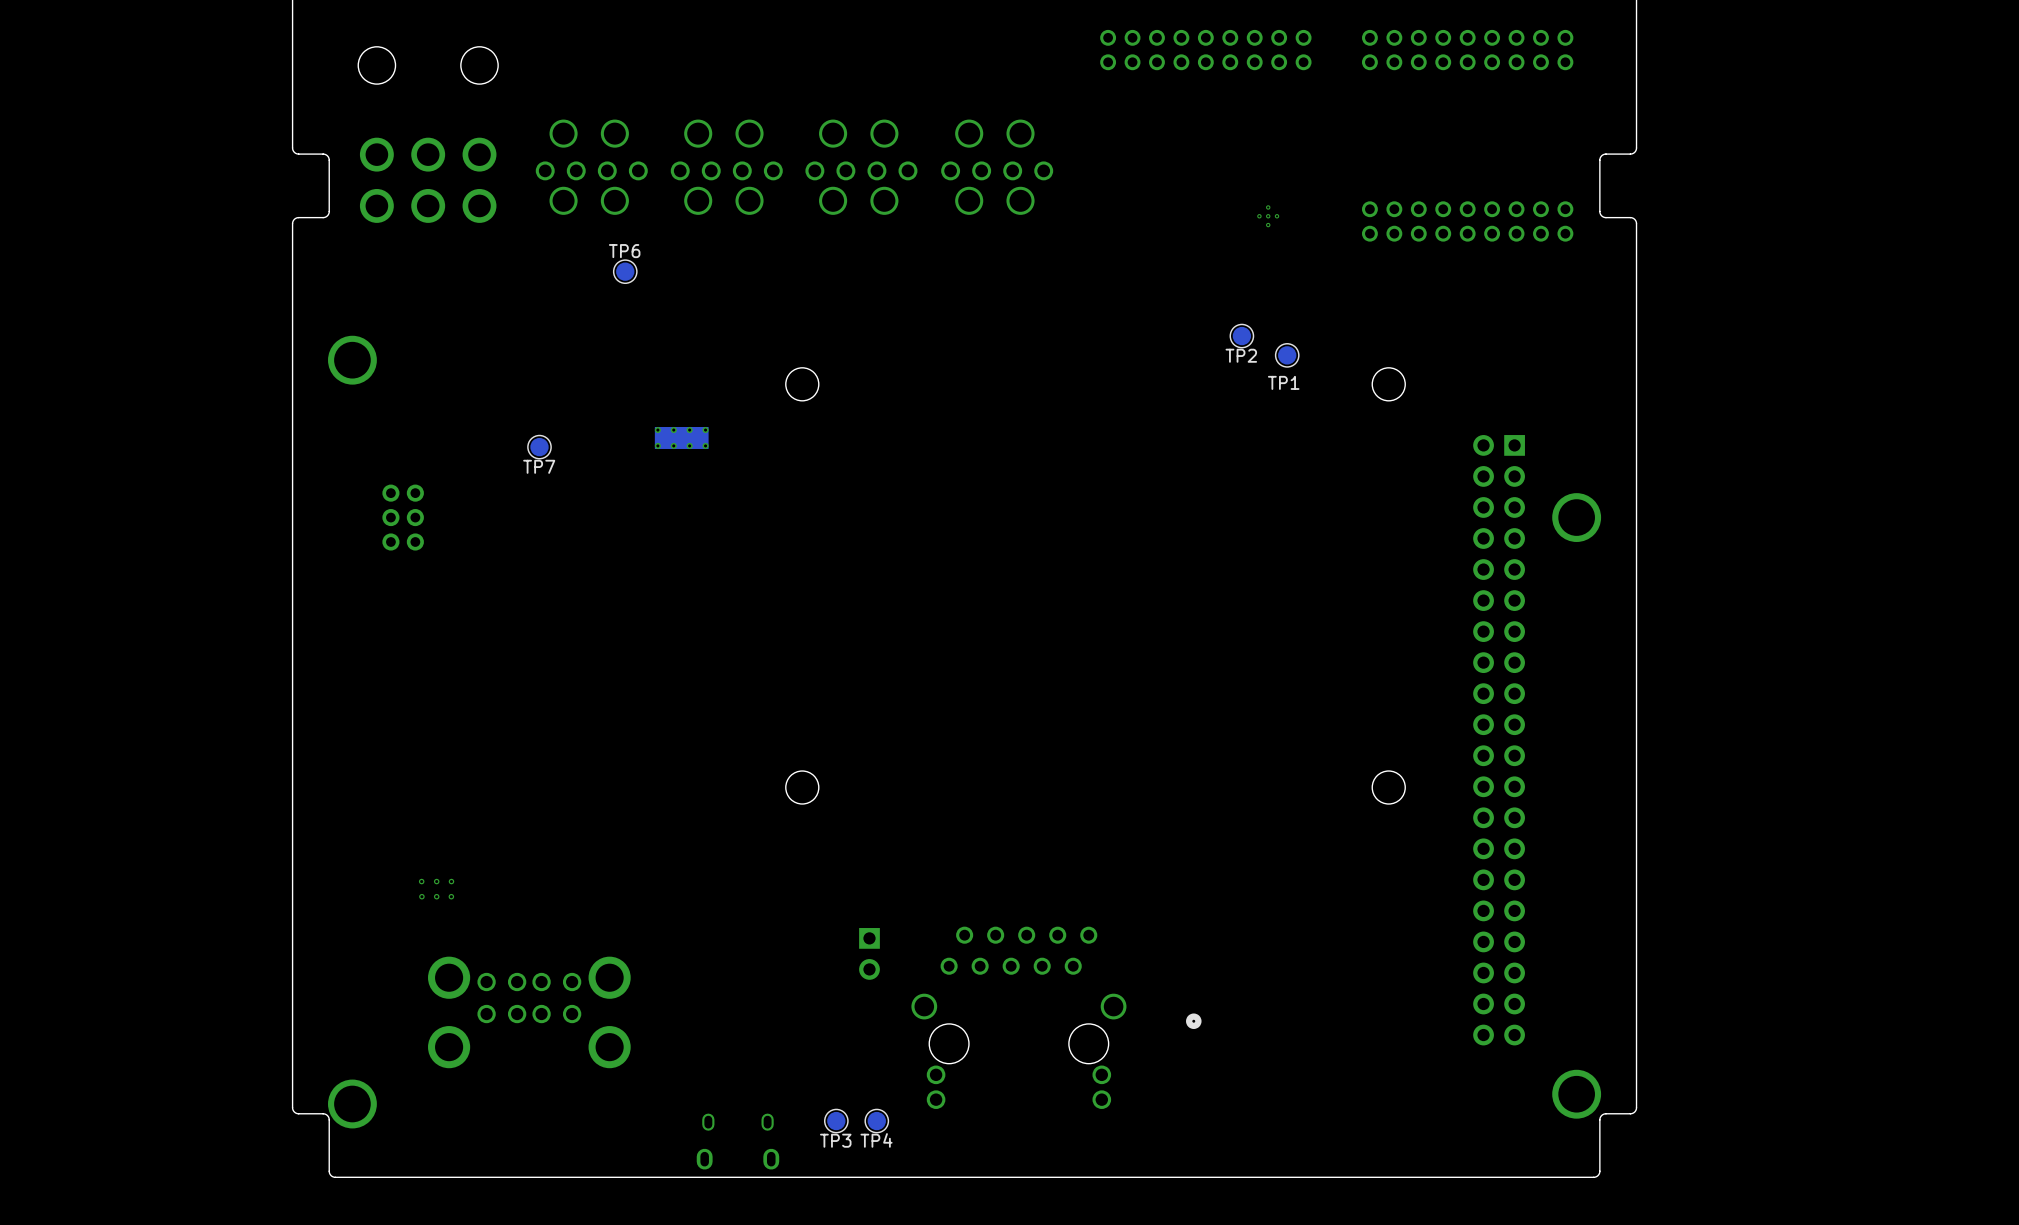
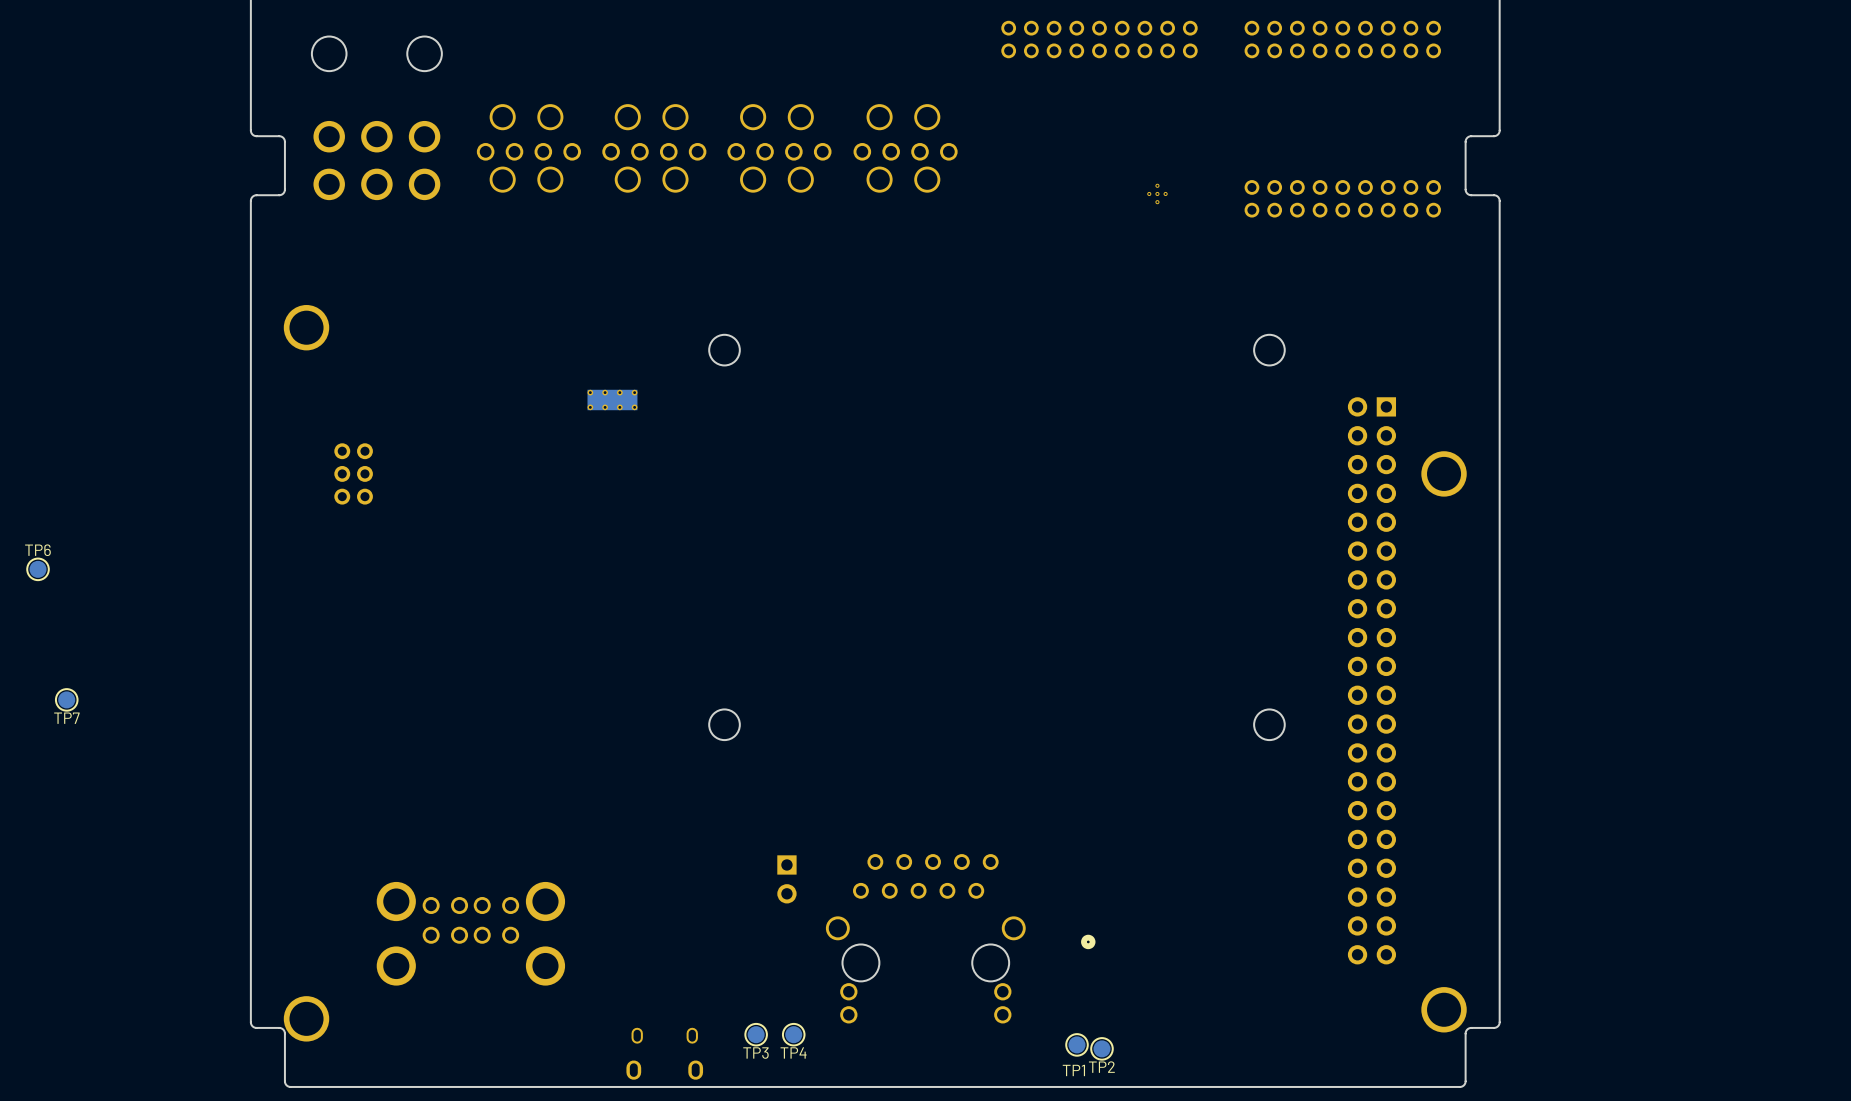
TP6 position: (625, 271) -> (38, 569)
TP2 position: (1241, 336) -> (1101, 1048)
TP1 position: (1287, 355) -> (1077, 1044)
TP7 position: (539, 447) -> (66, 699)
part: (436, 889) -> none

